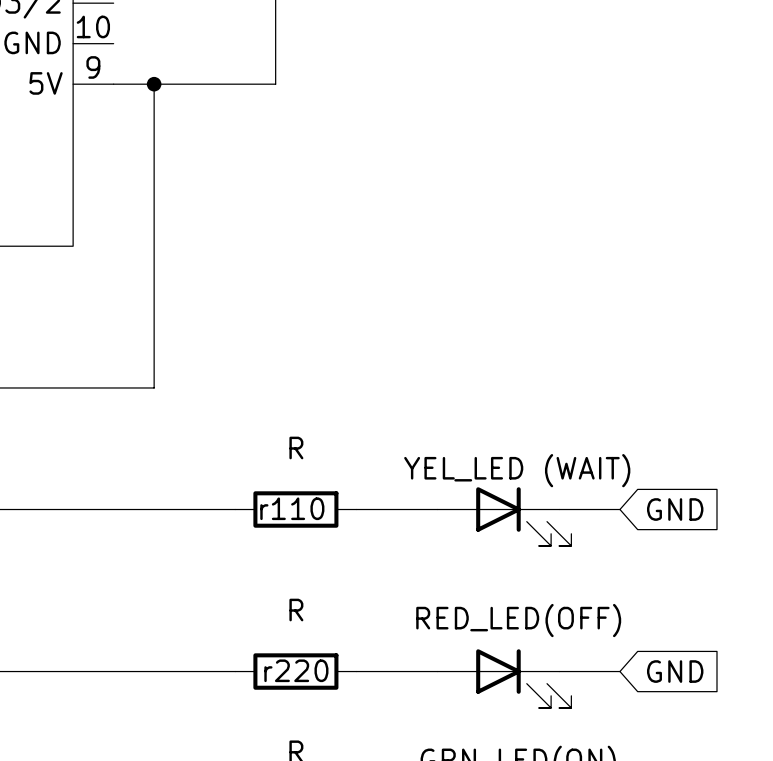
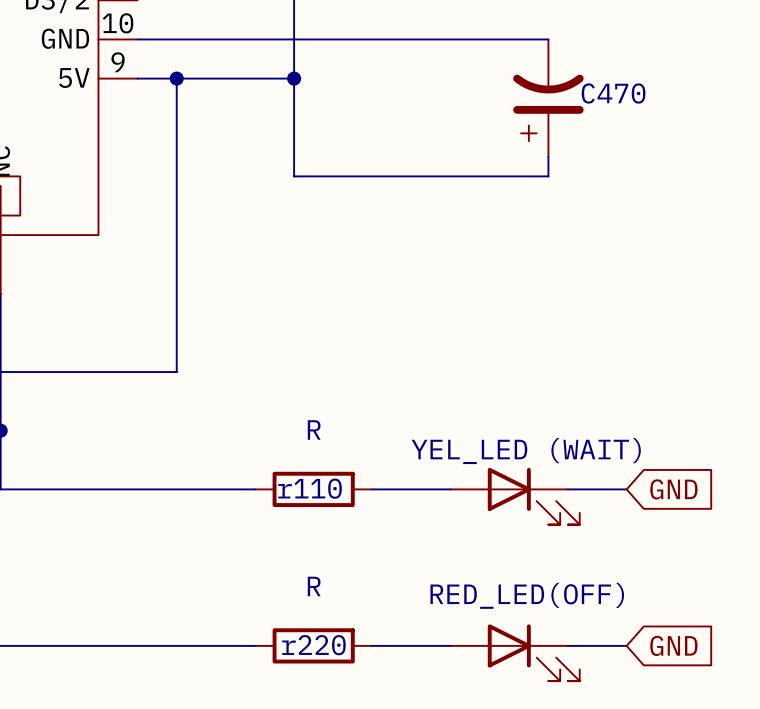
wire: none -> (137, 39) (548, 39)
wire: none -> (294, 78) (294, 176) (548, 176) (548, 156)
junction: none -> (294, 78)
C470: none -> (548, 98)

